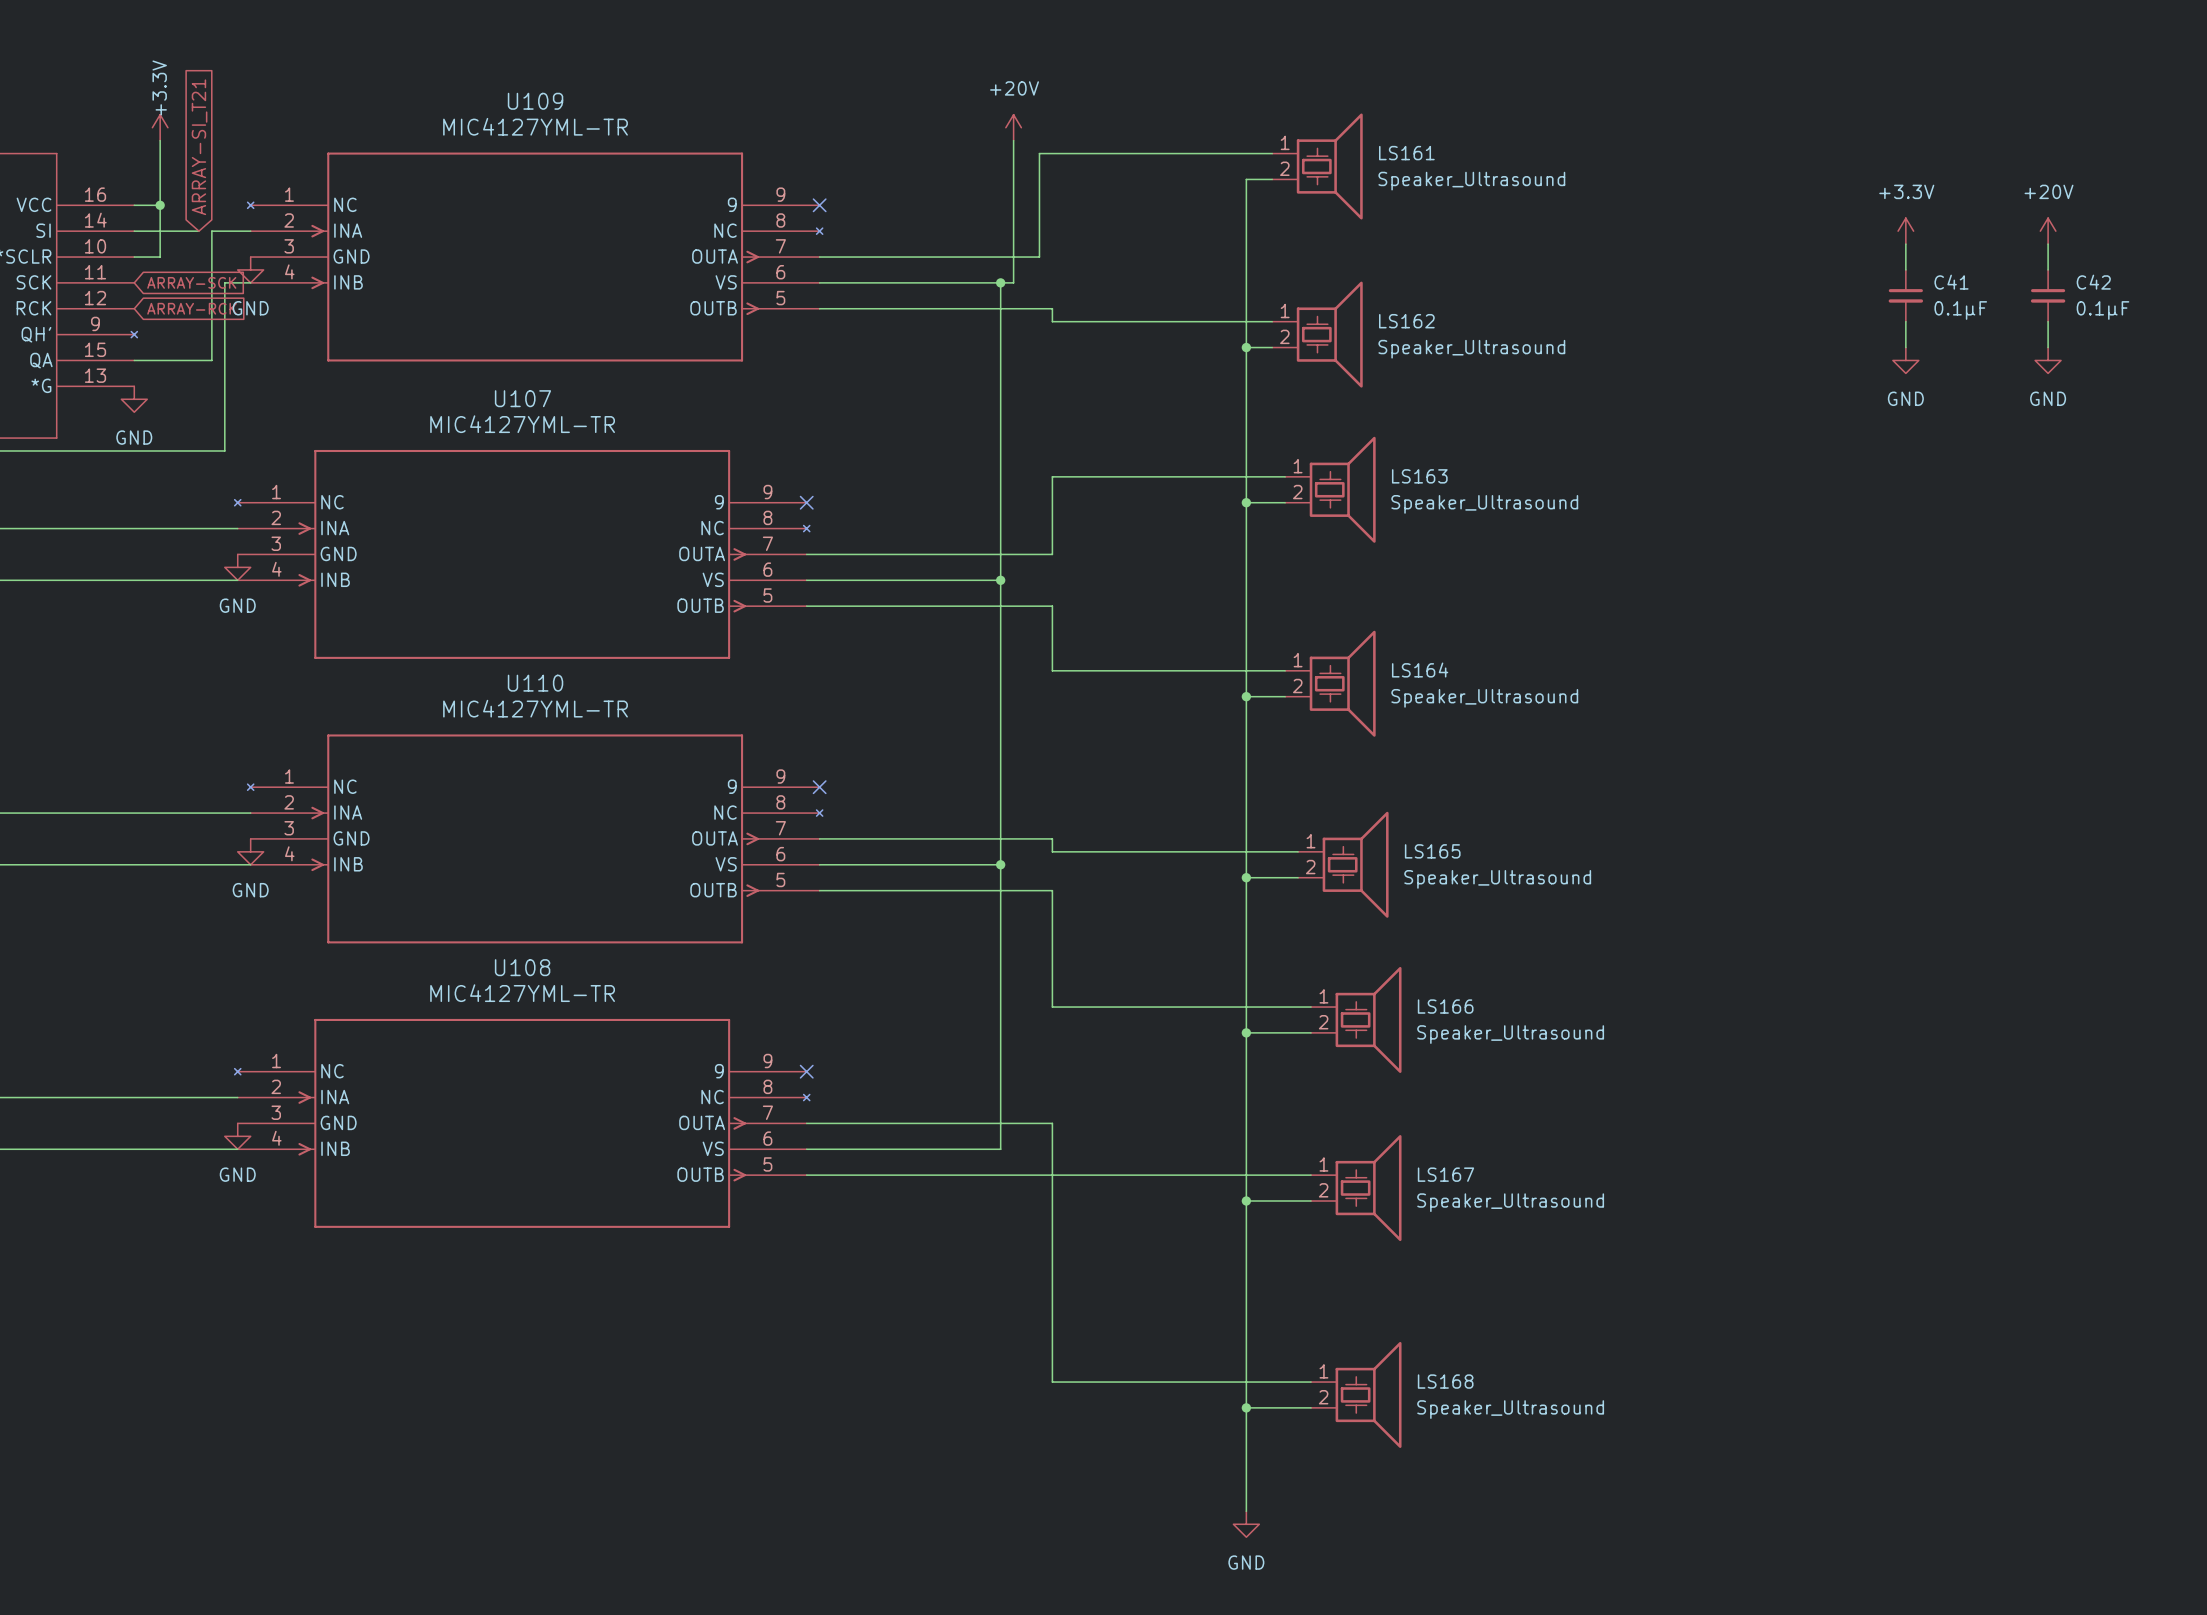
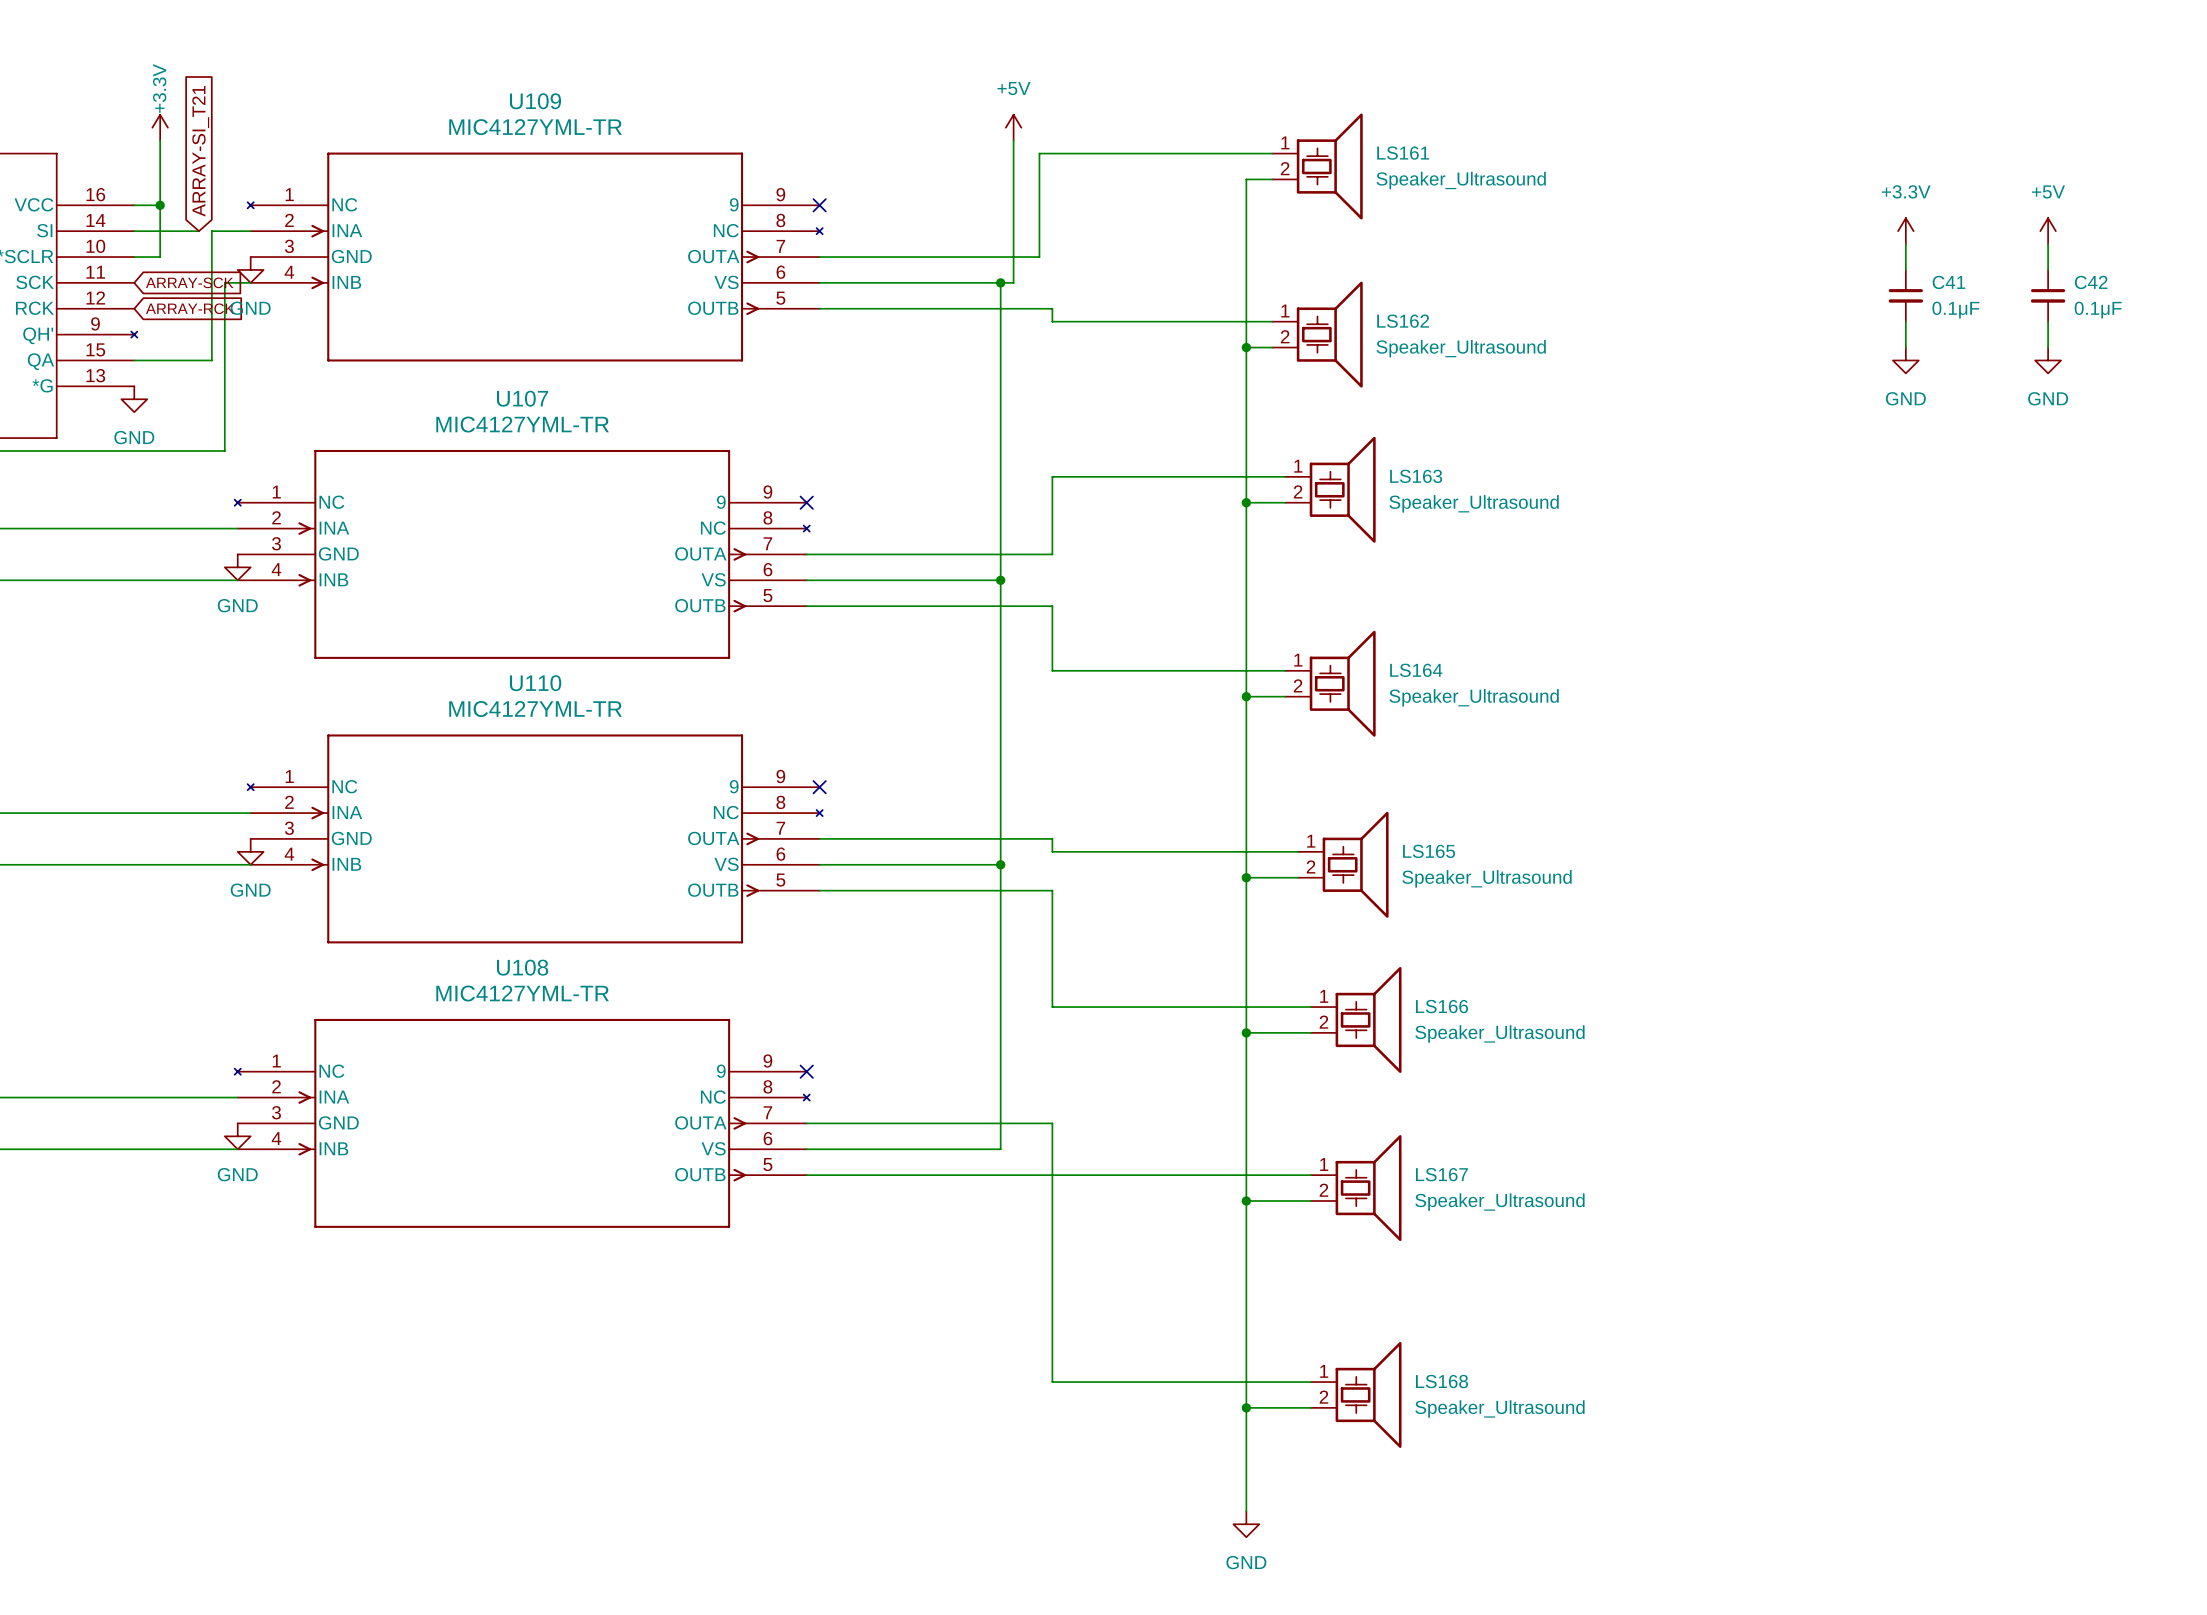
power symbol: +20V (1013, 127) -> +5V (1013, 127)
power symbol: +20V (2048, 231) -> +5V (2048, 231)

